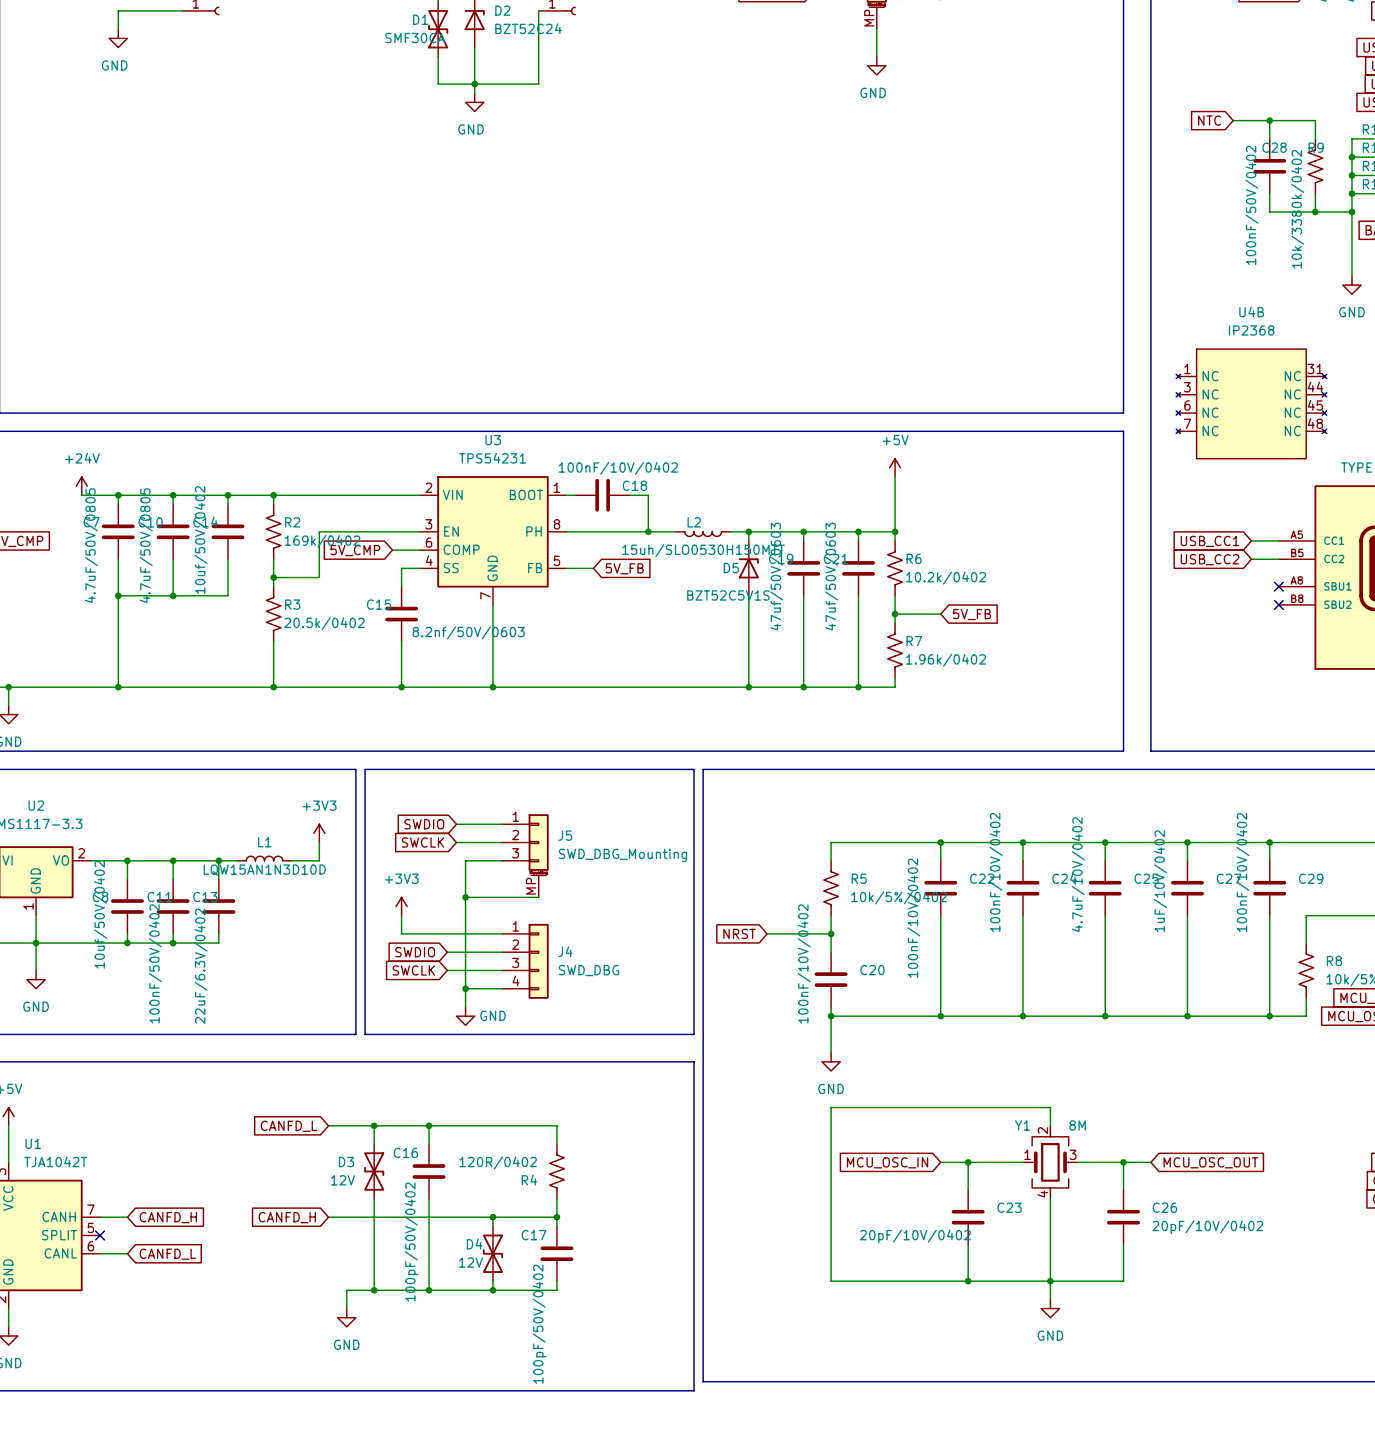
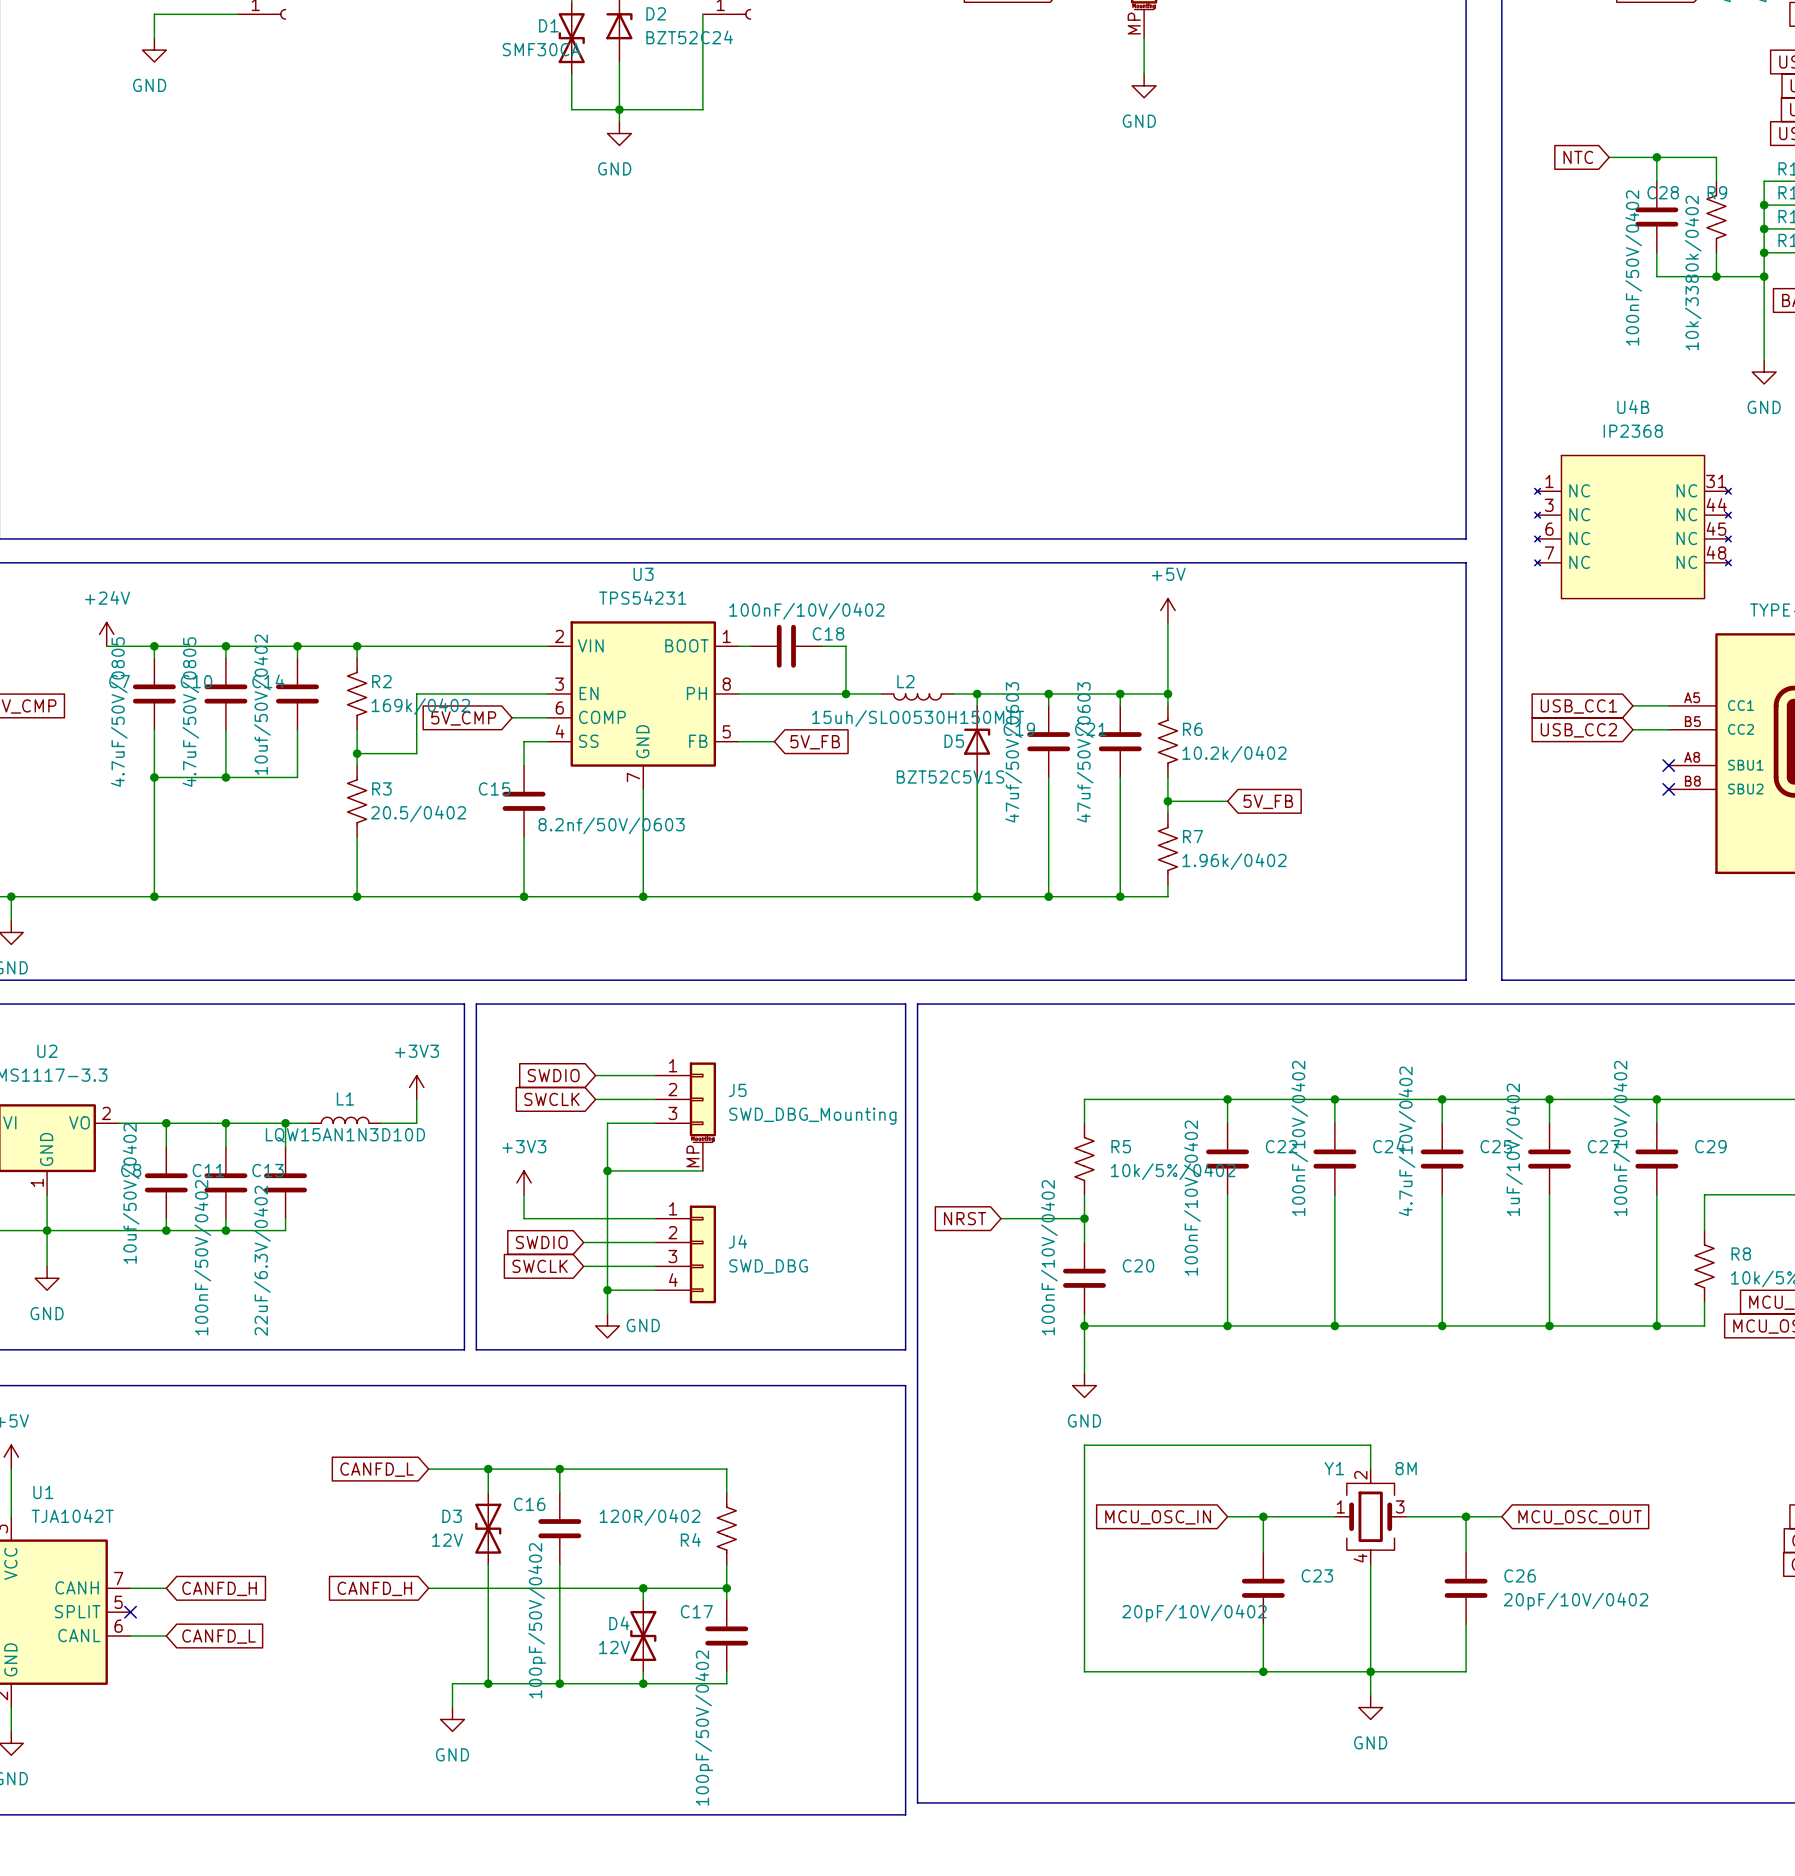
R3 value: 20.5k/0402 (324, 623) -> 20.5/0402 (418, 813)

